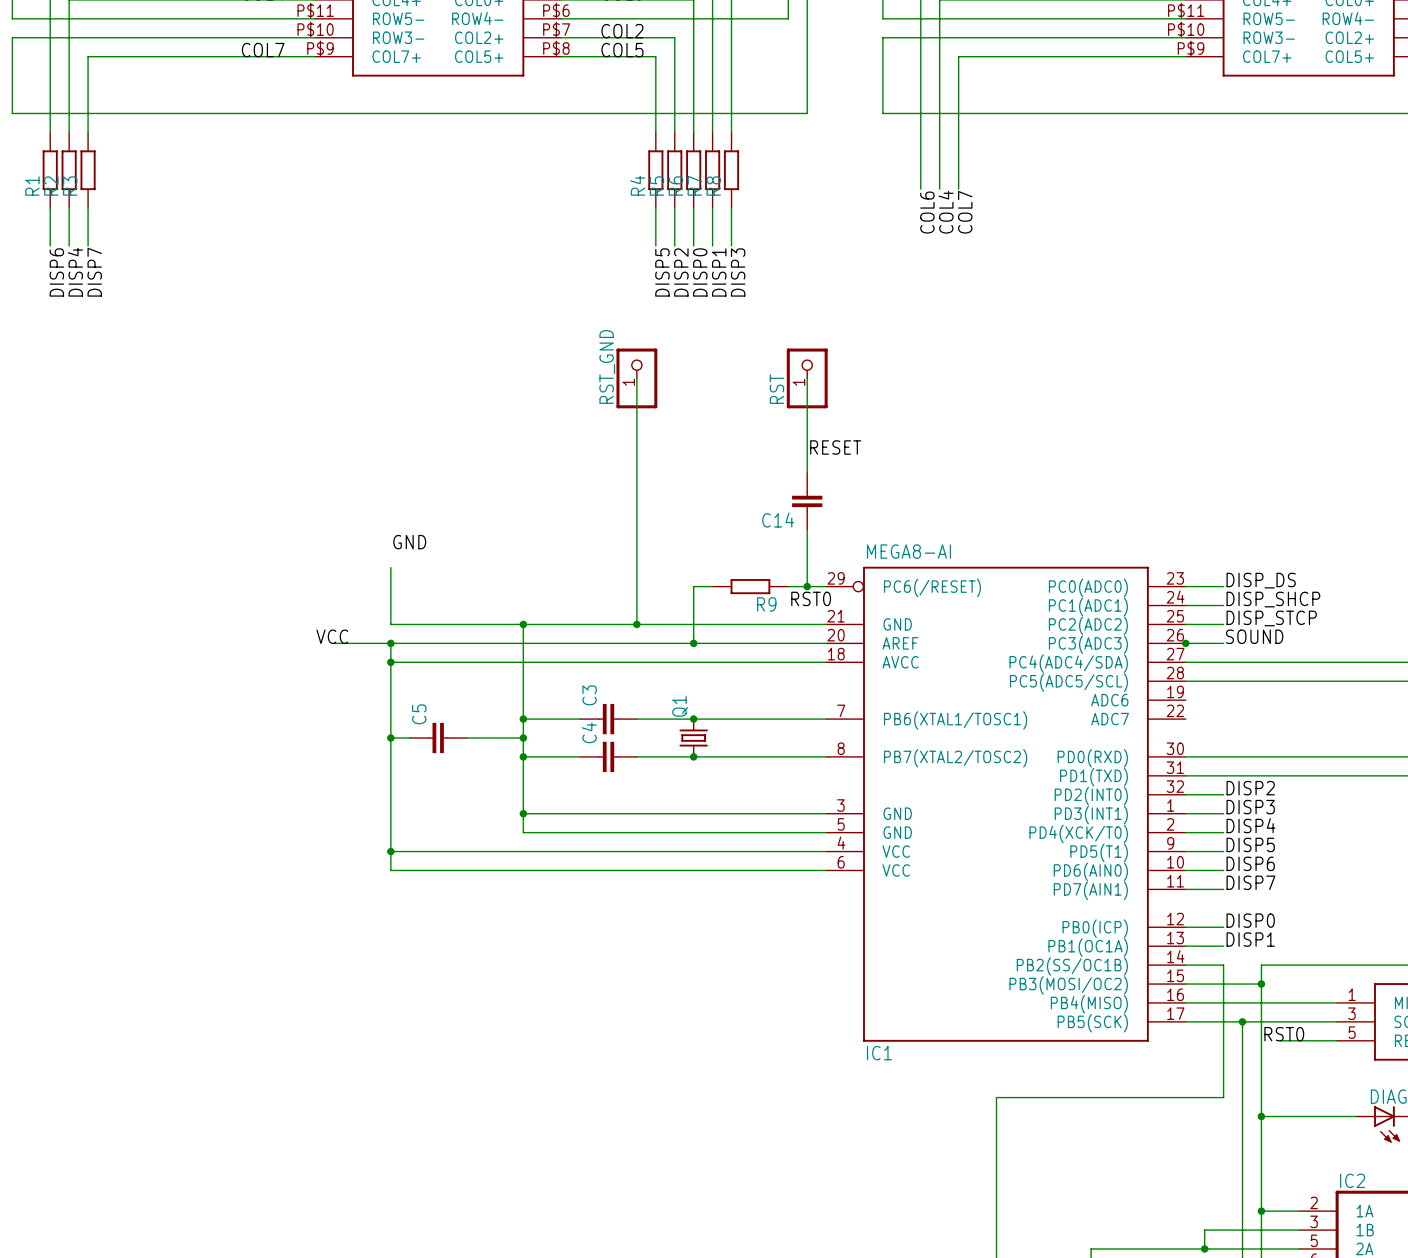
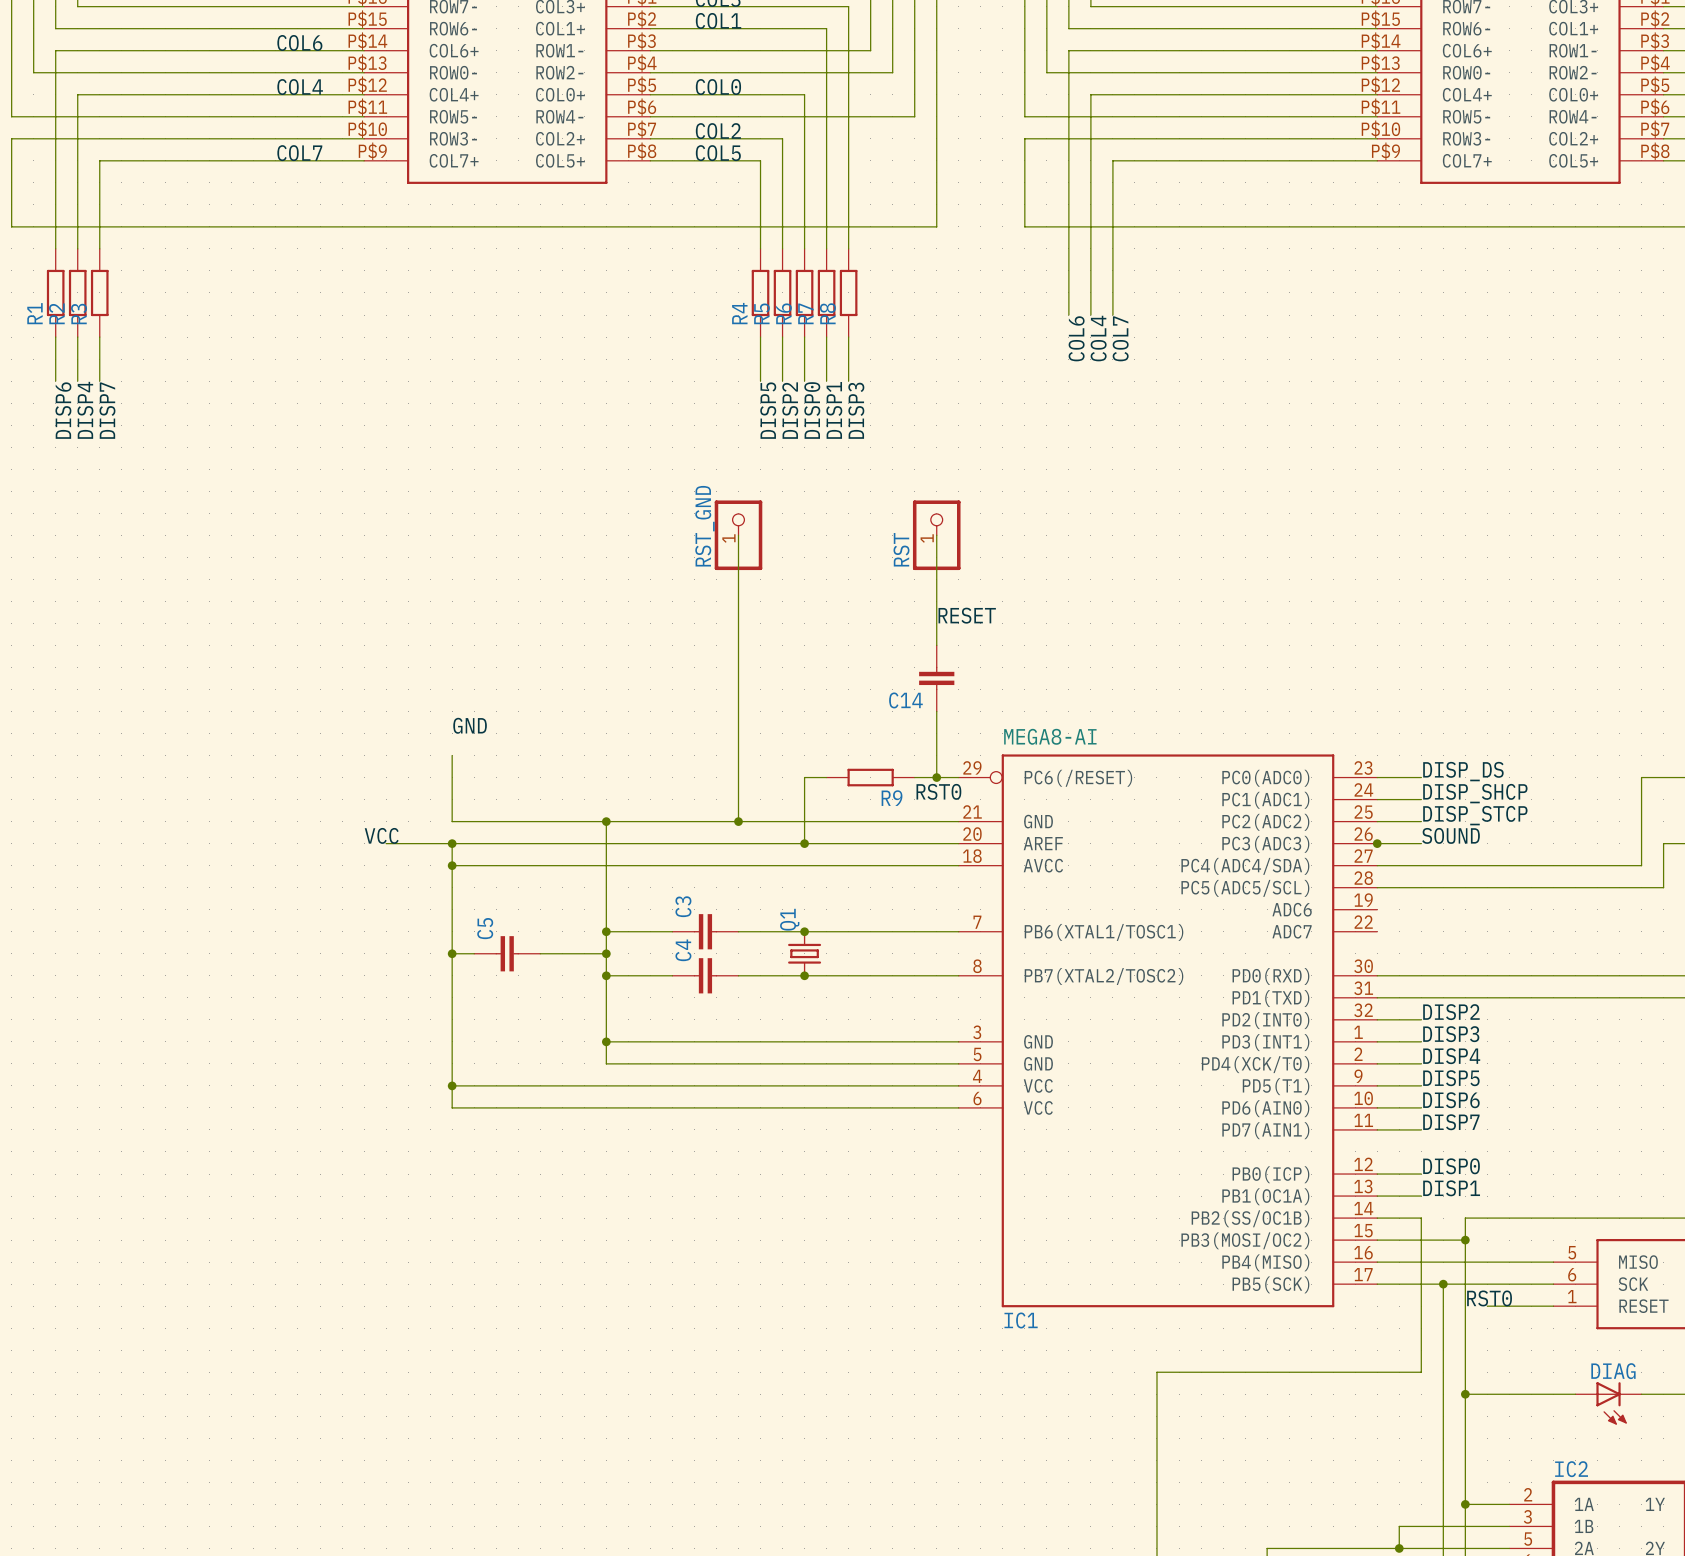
part pin number: 1 (1352, 994) -> 5 (1572, 1252)
part pin number: 3 (1351, 1013) -> 6 (1572, 1274)
part pin number: 5 (1352, 1032) -> 1 (1572, 1296)

